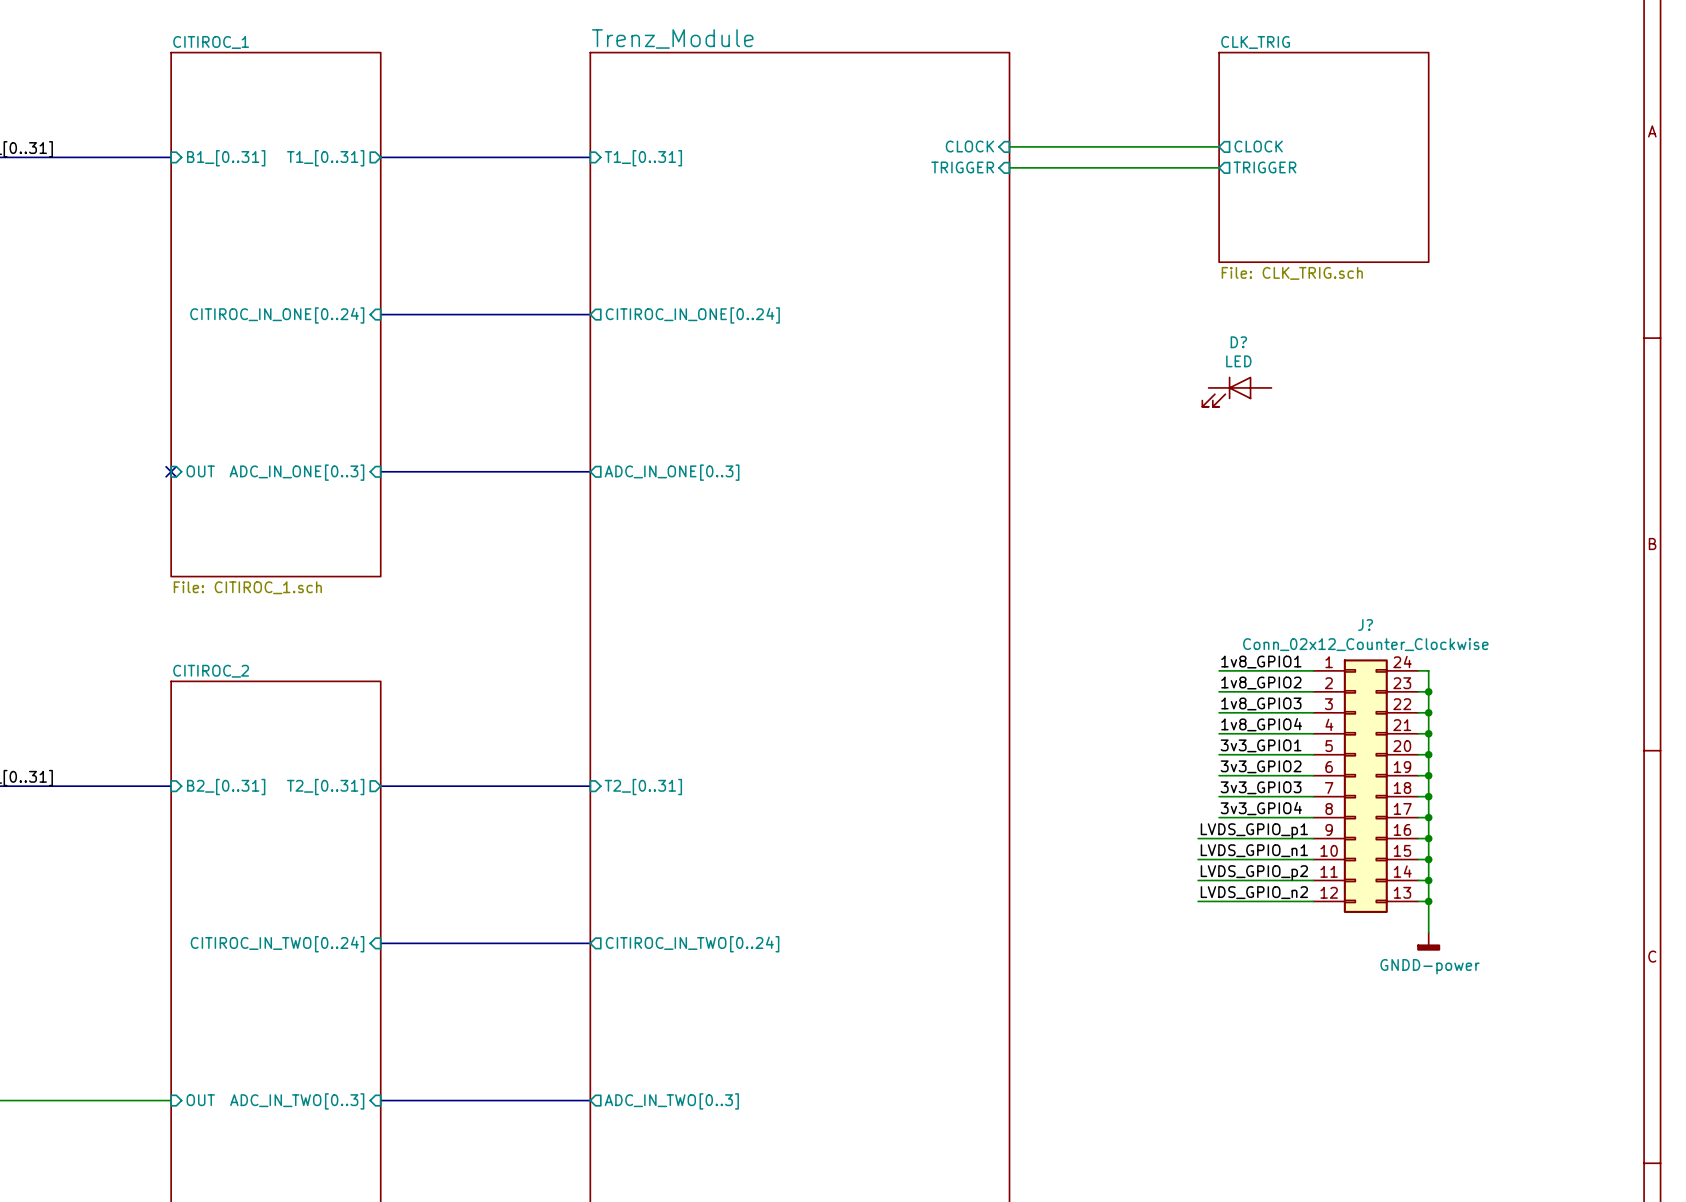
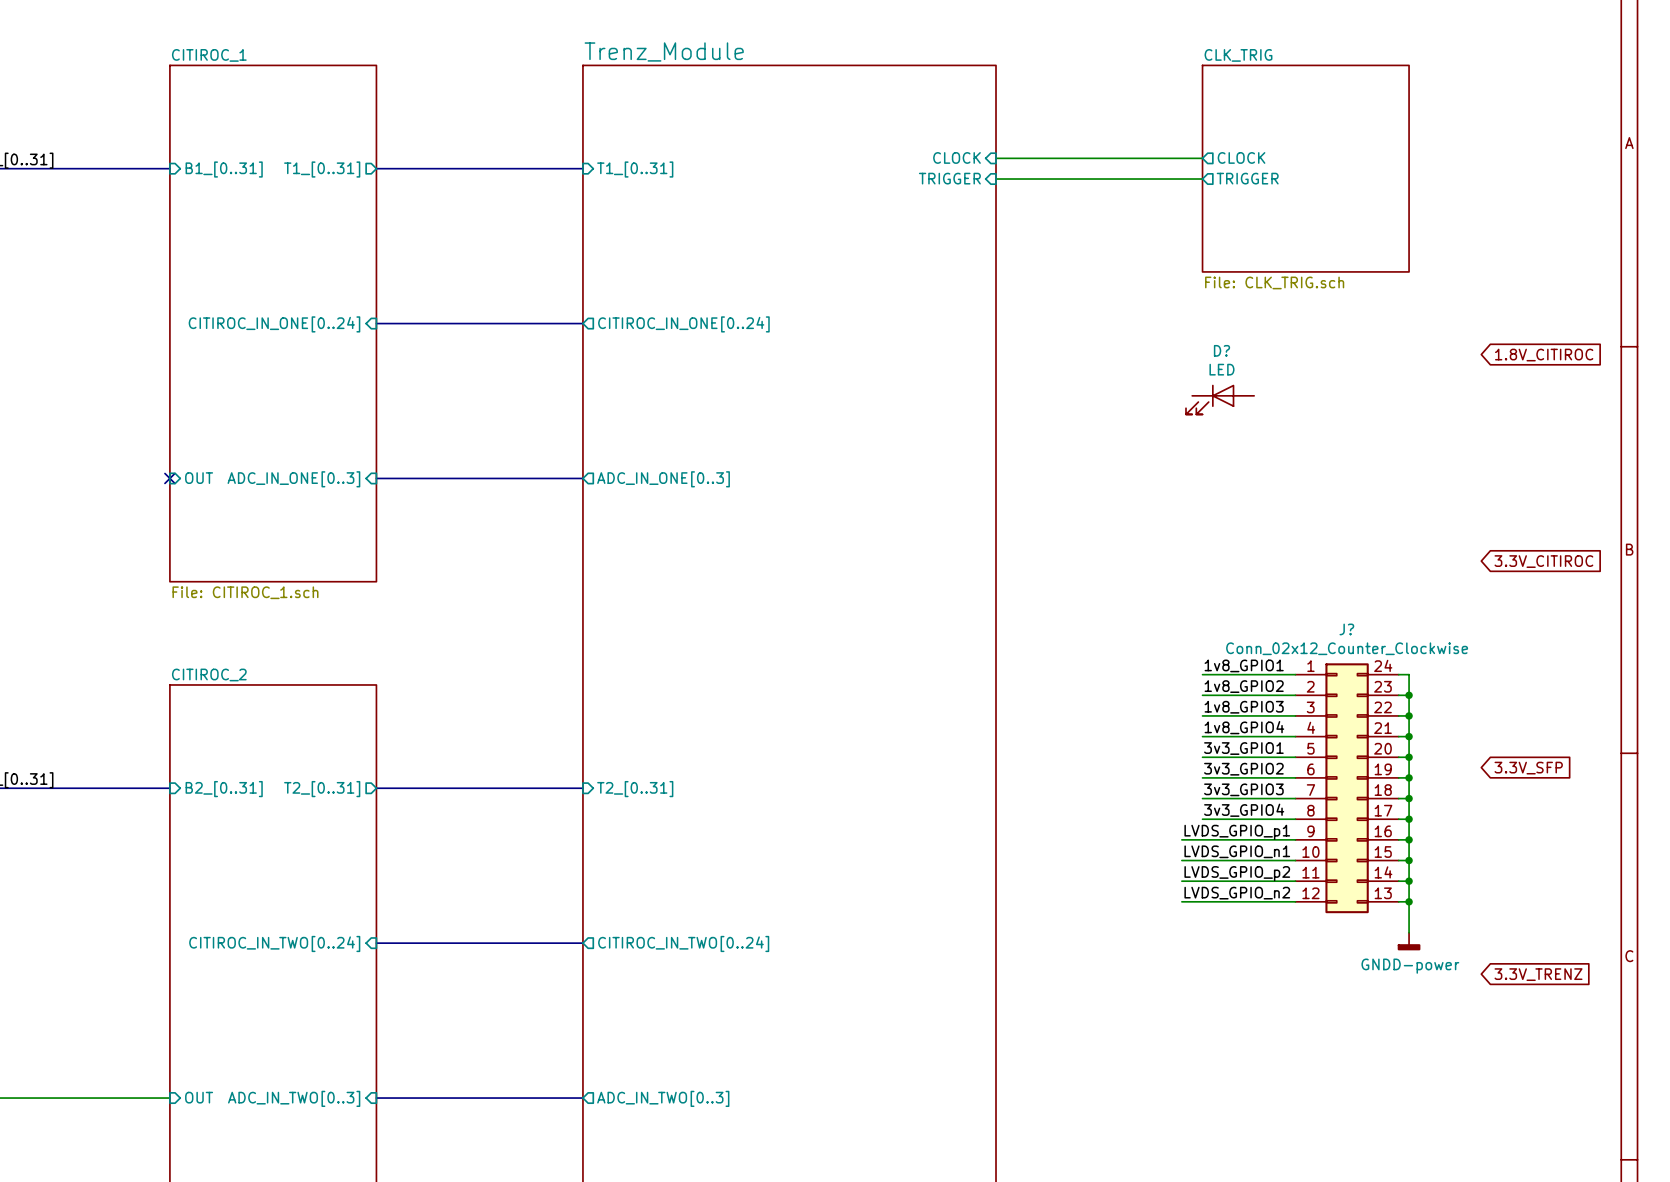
global label: none -> 1.8V_CITIROC (1544, 355)
global label: none -> 3.3V_CITIROC (1543, 561)
global label: none -> 3.3V_SFP (1528, 768)
global label: none -> 3.3V_TRENZ (1538, 974)

